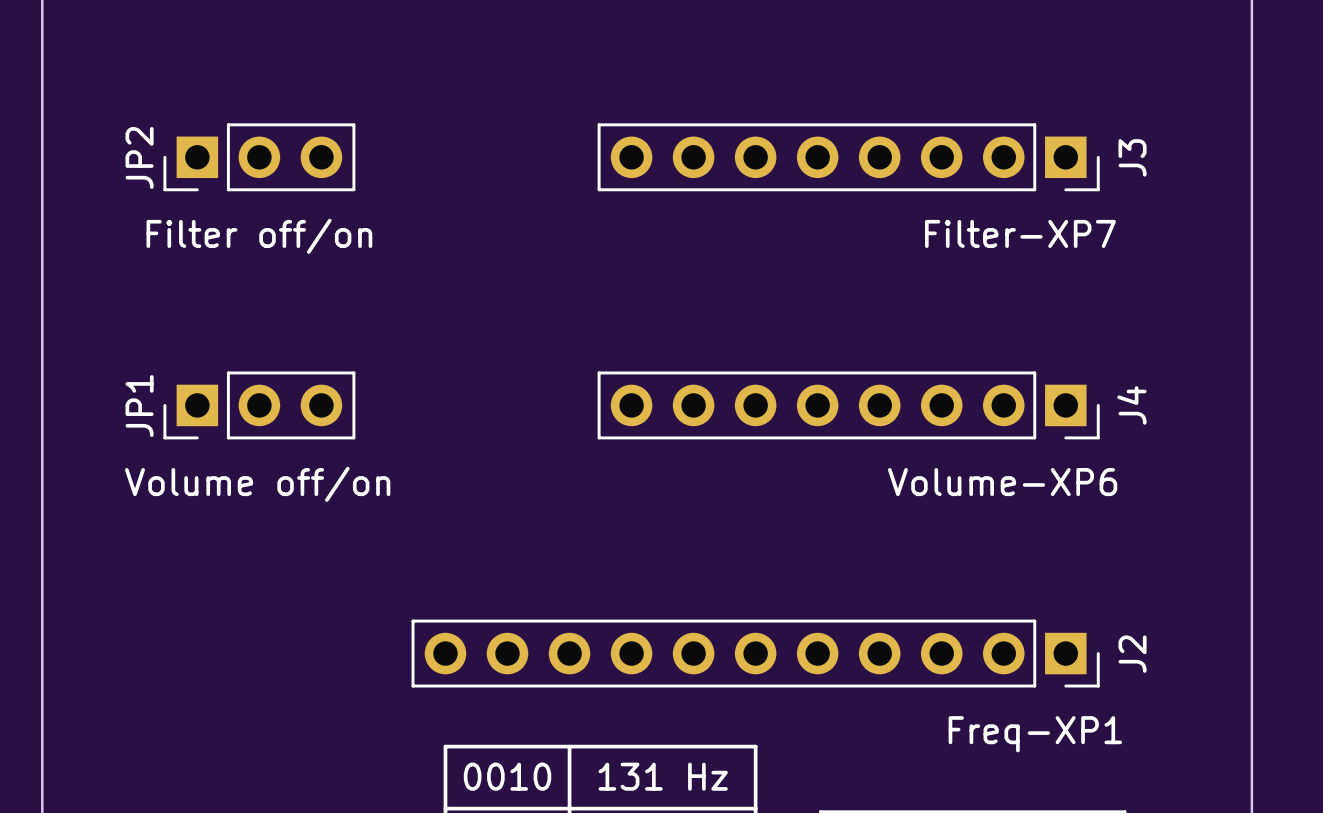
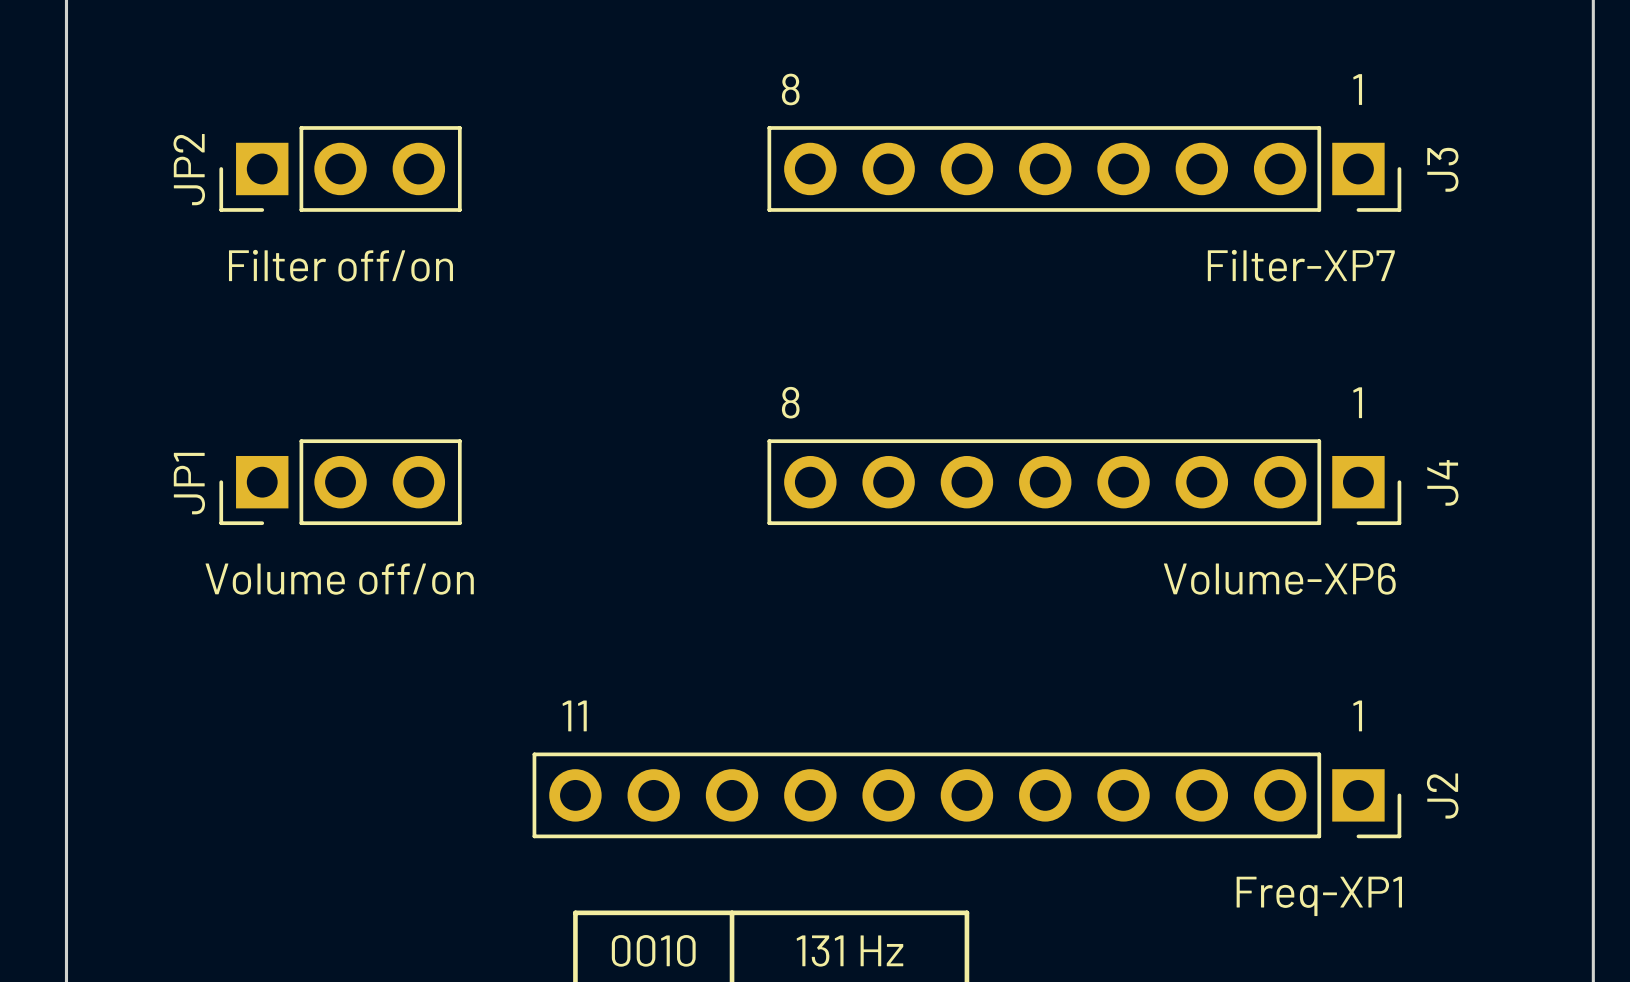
text: none -> 8 (790, 89)
text: none -> 1 (1357, 89)
text: none -> 8 (790, 402)
text: none -> 1 (1357, 402)
text: none -> 11 (574, 715)
text: none -> 1 (1357, 715)

